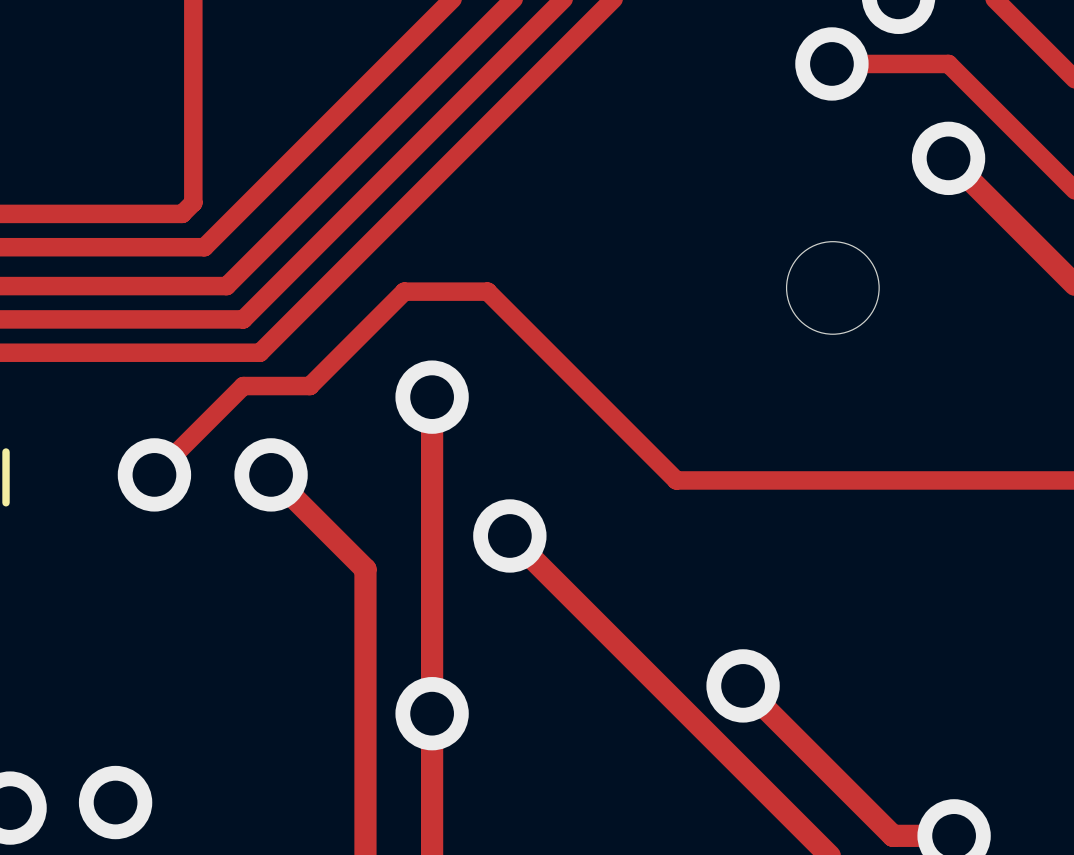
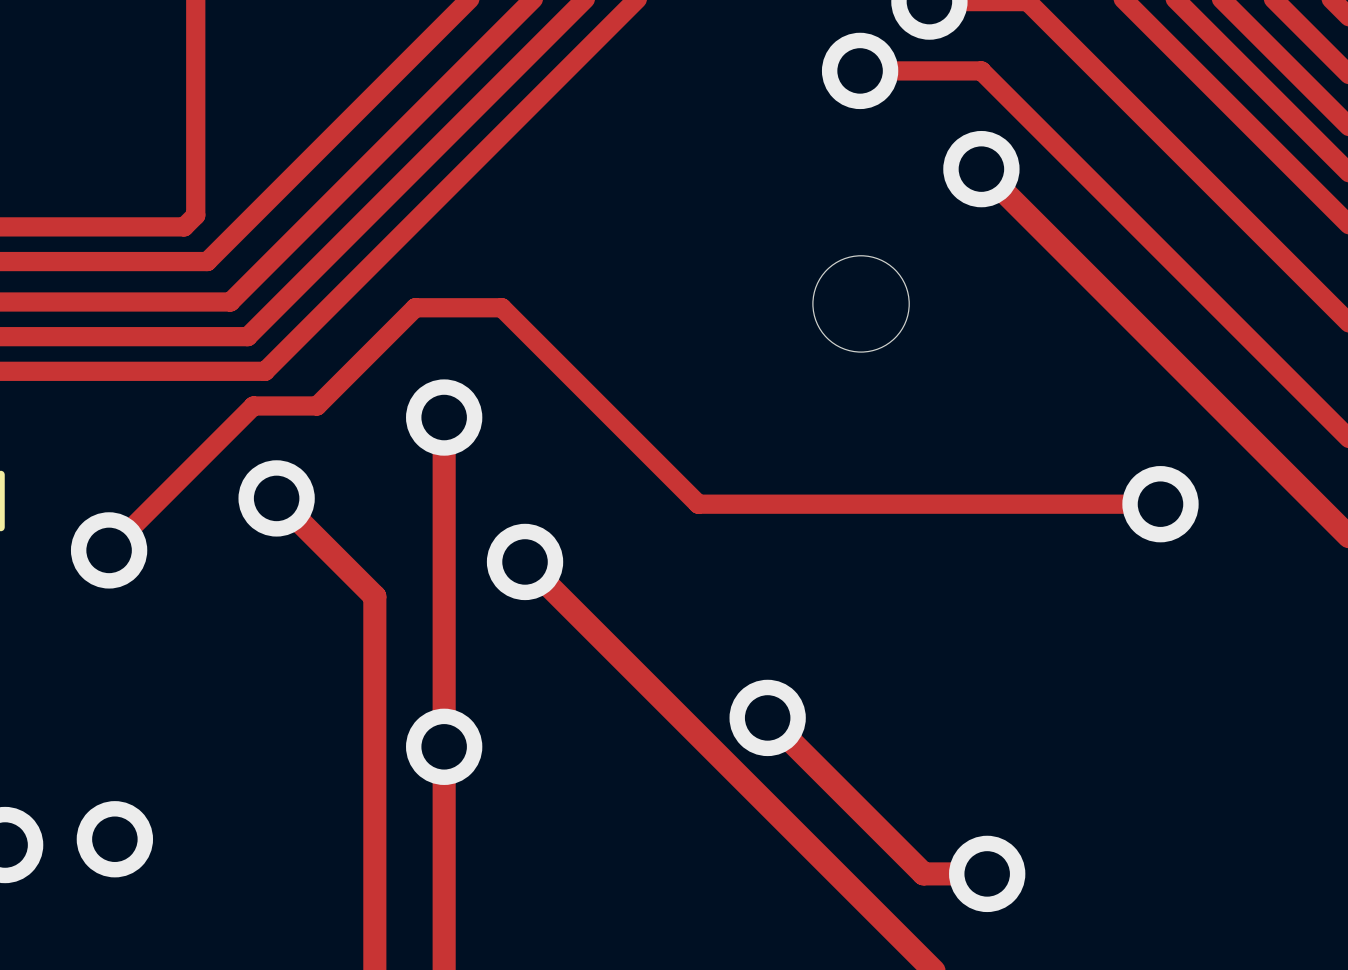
track: (248, 386) (243, 386) (154, 474) -> (253, 405) (109, 550)
via position: (154, 474) -> (109, 550)

